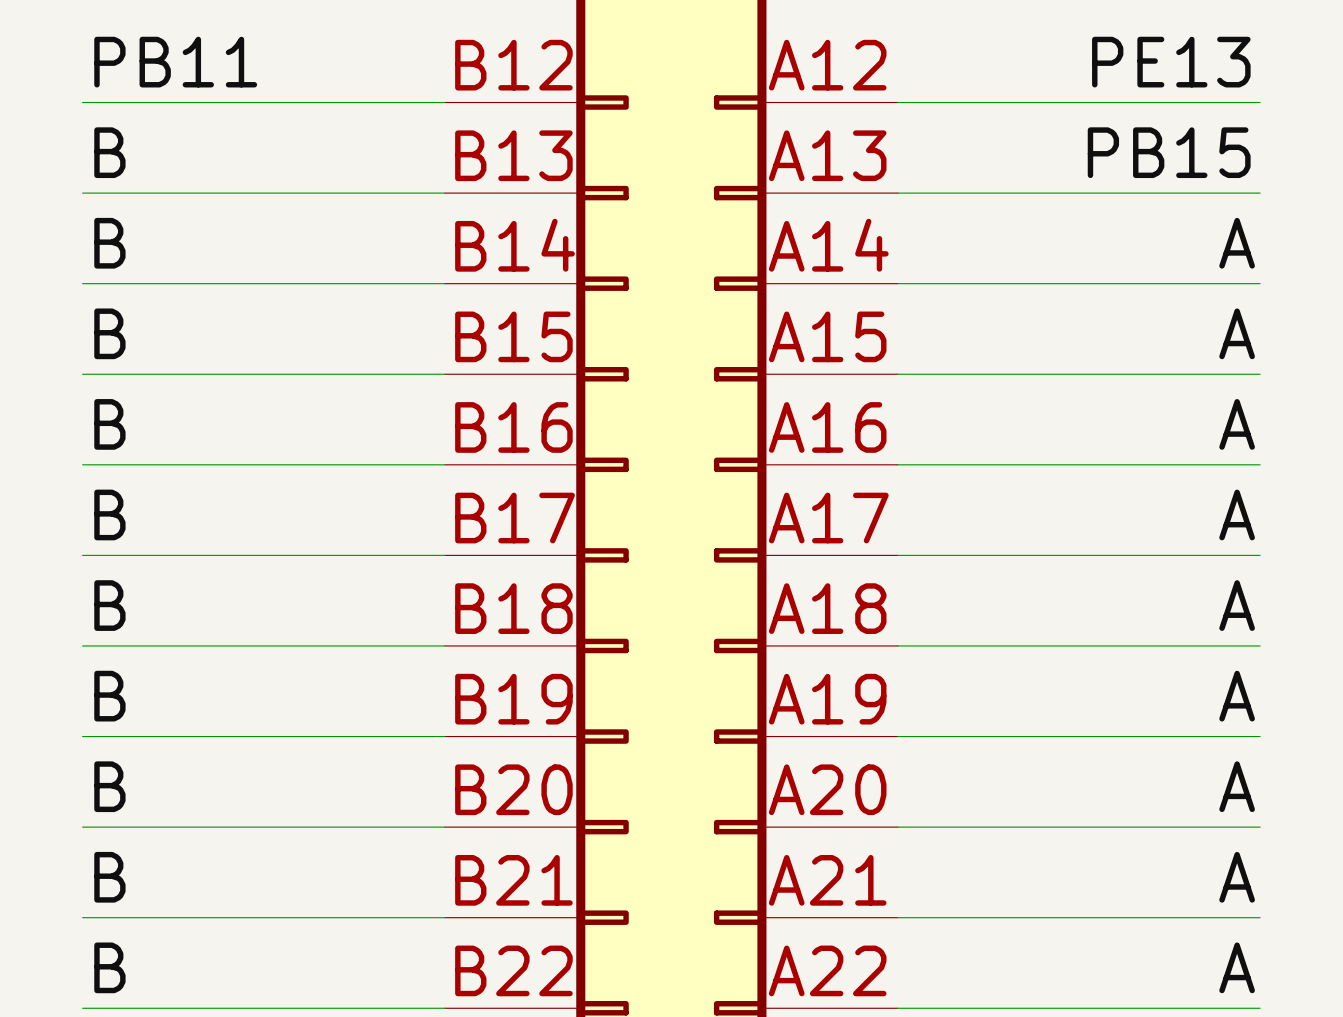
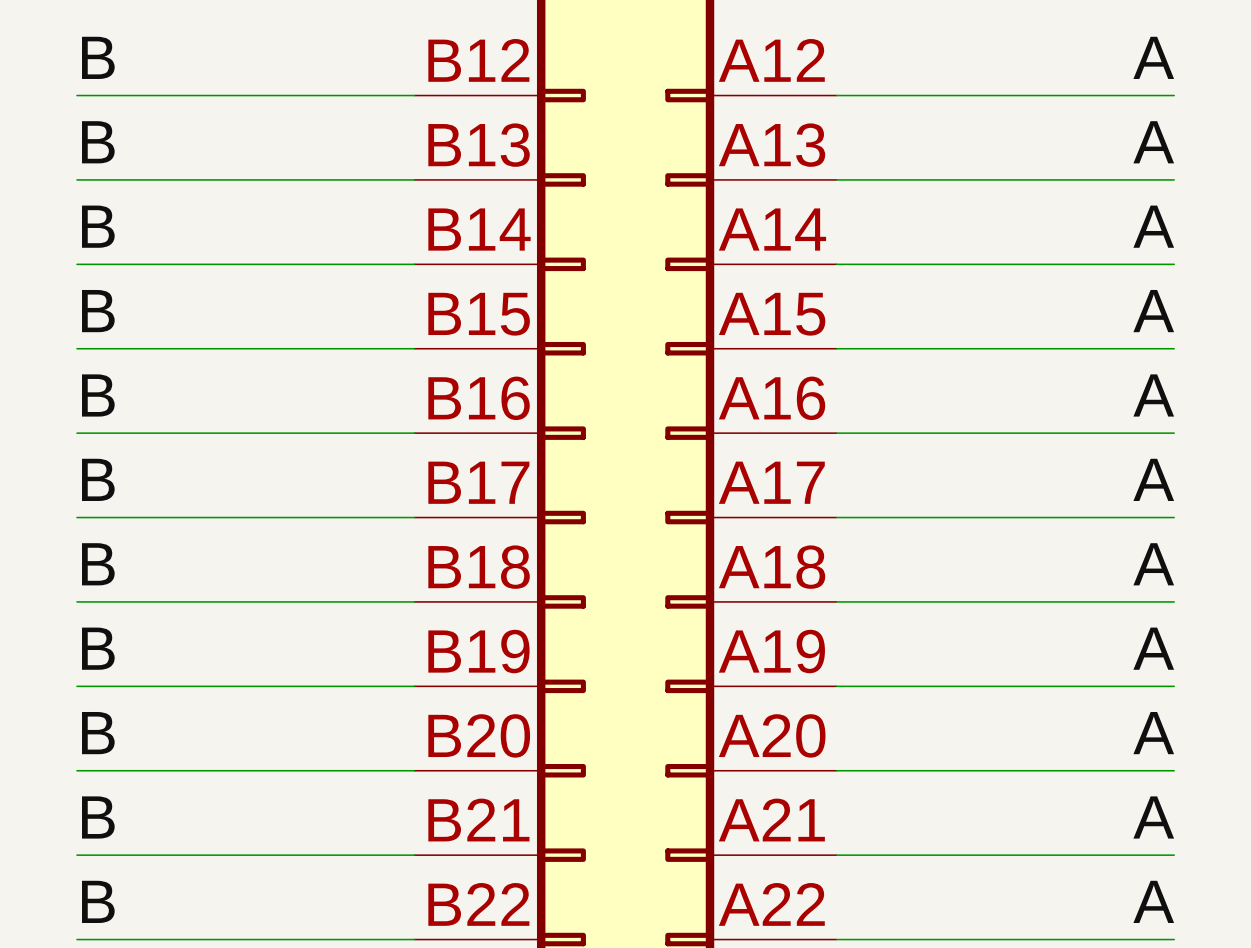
label: PB11 (175, 62) -> B (98, 57)
label: PE13 (1171, 62) -> A (1153, 57)
label: PB15 (1169, 152) -> A (1153, 142)

